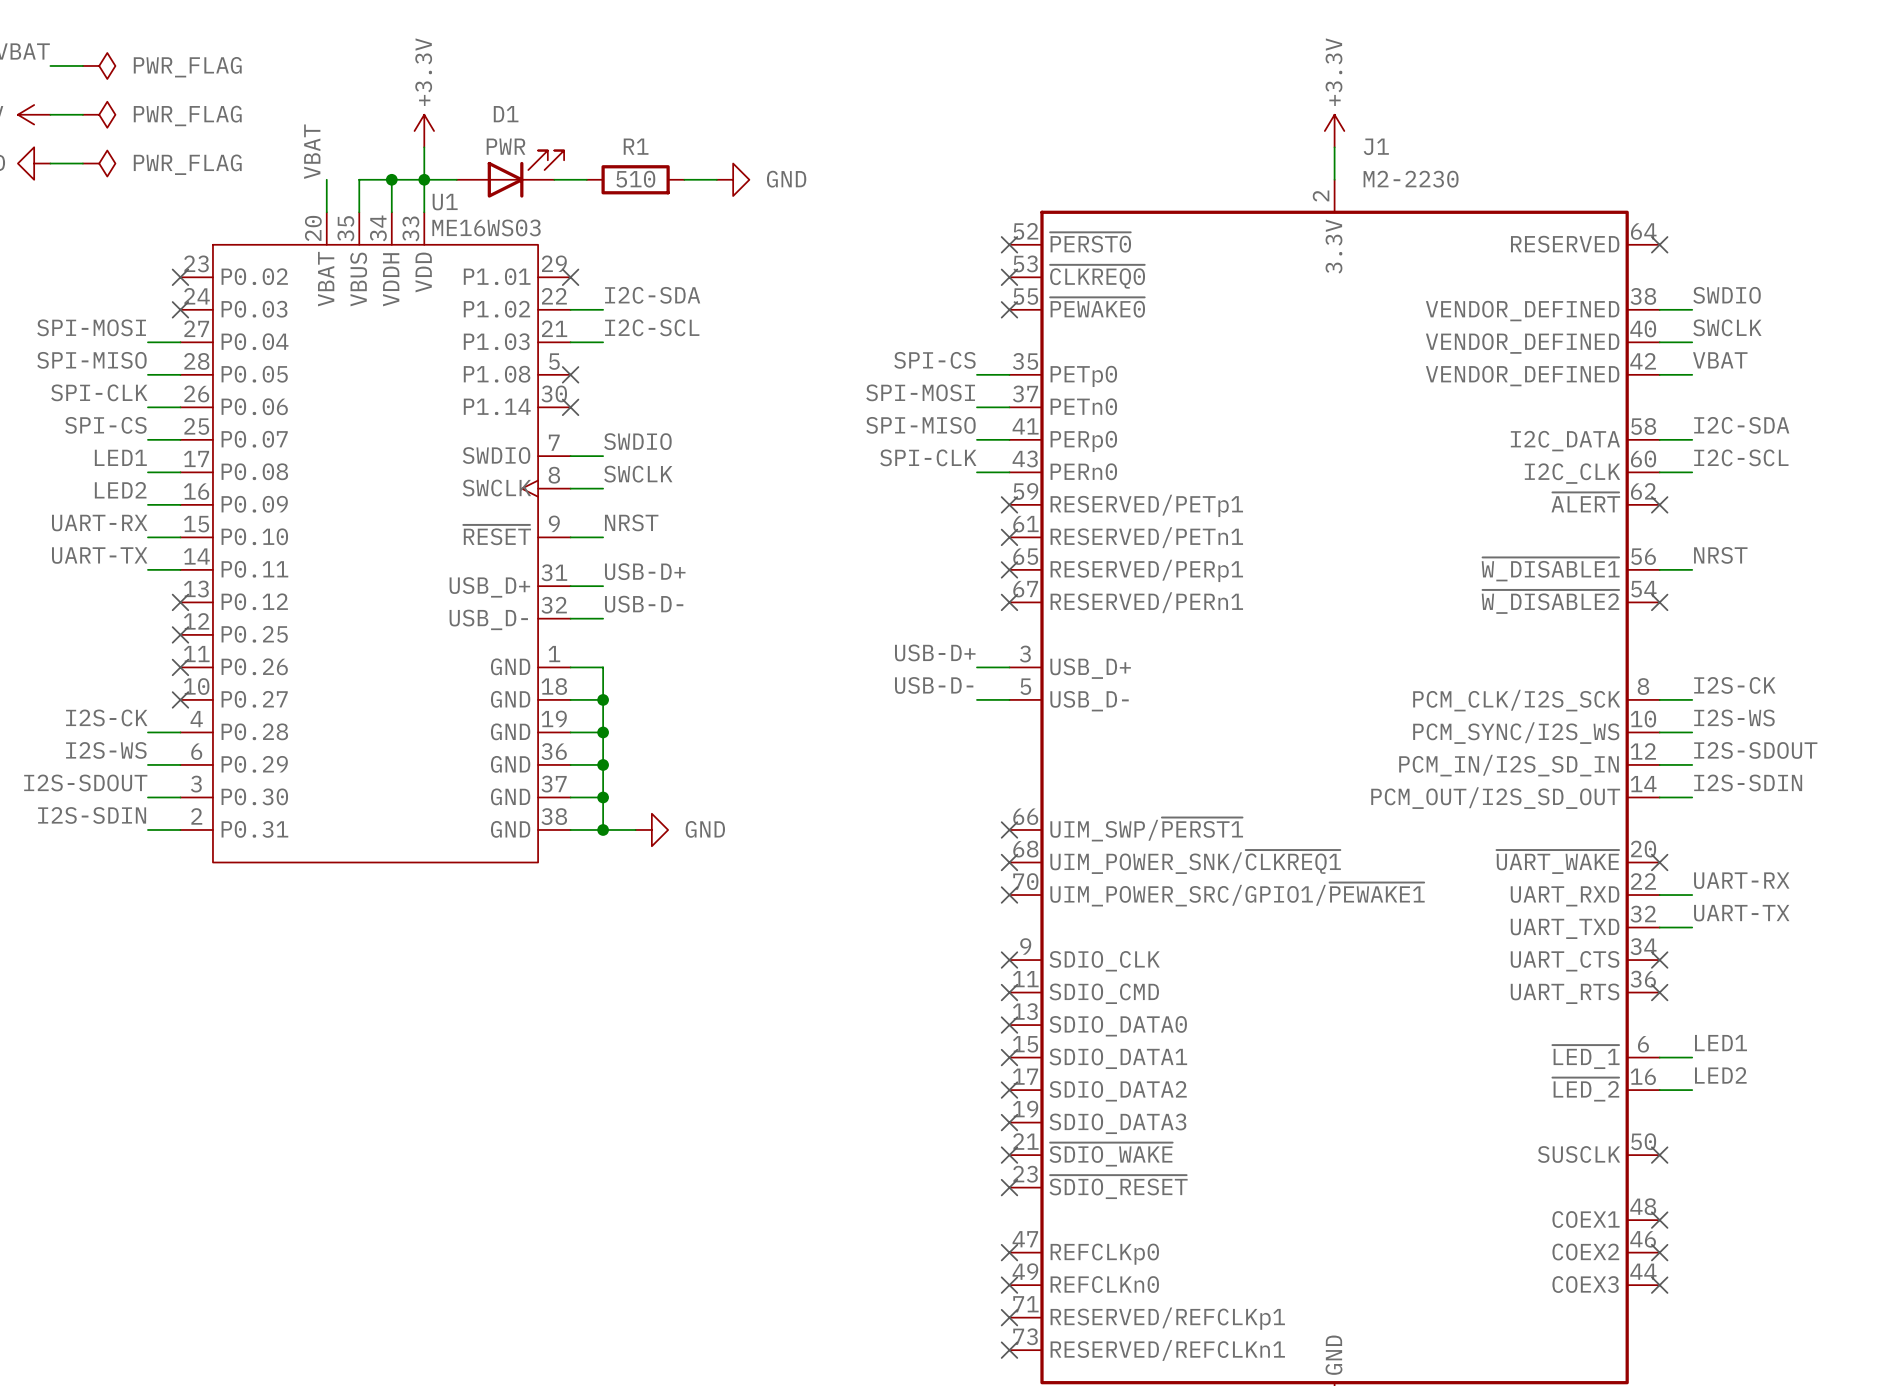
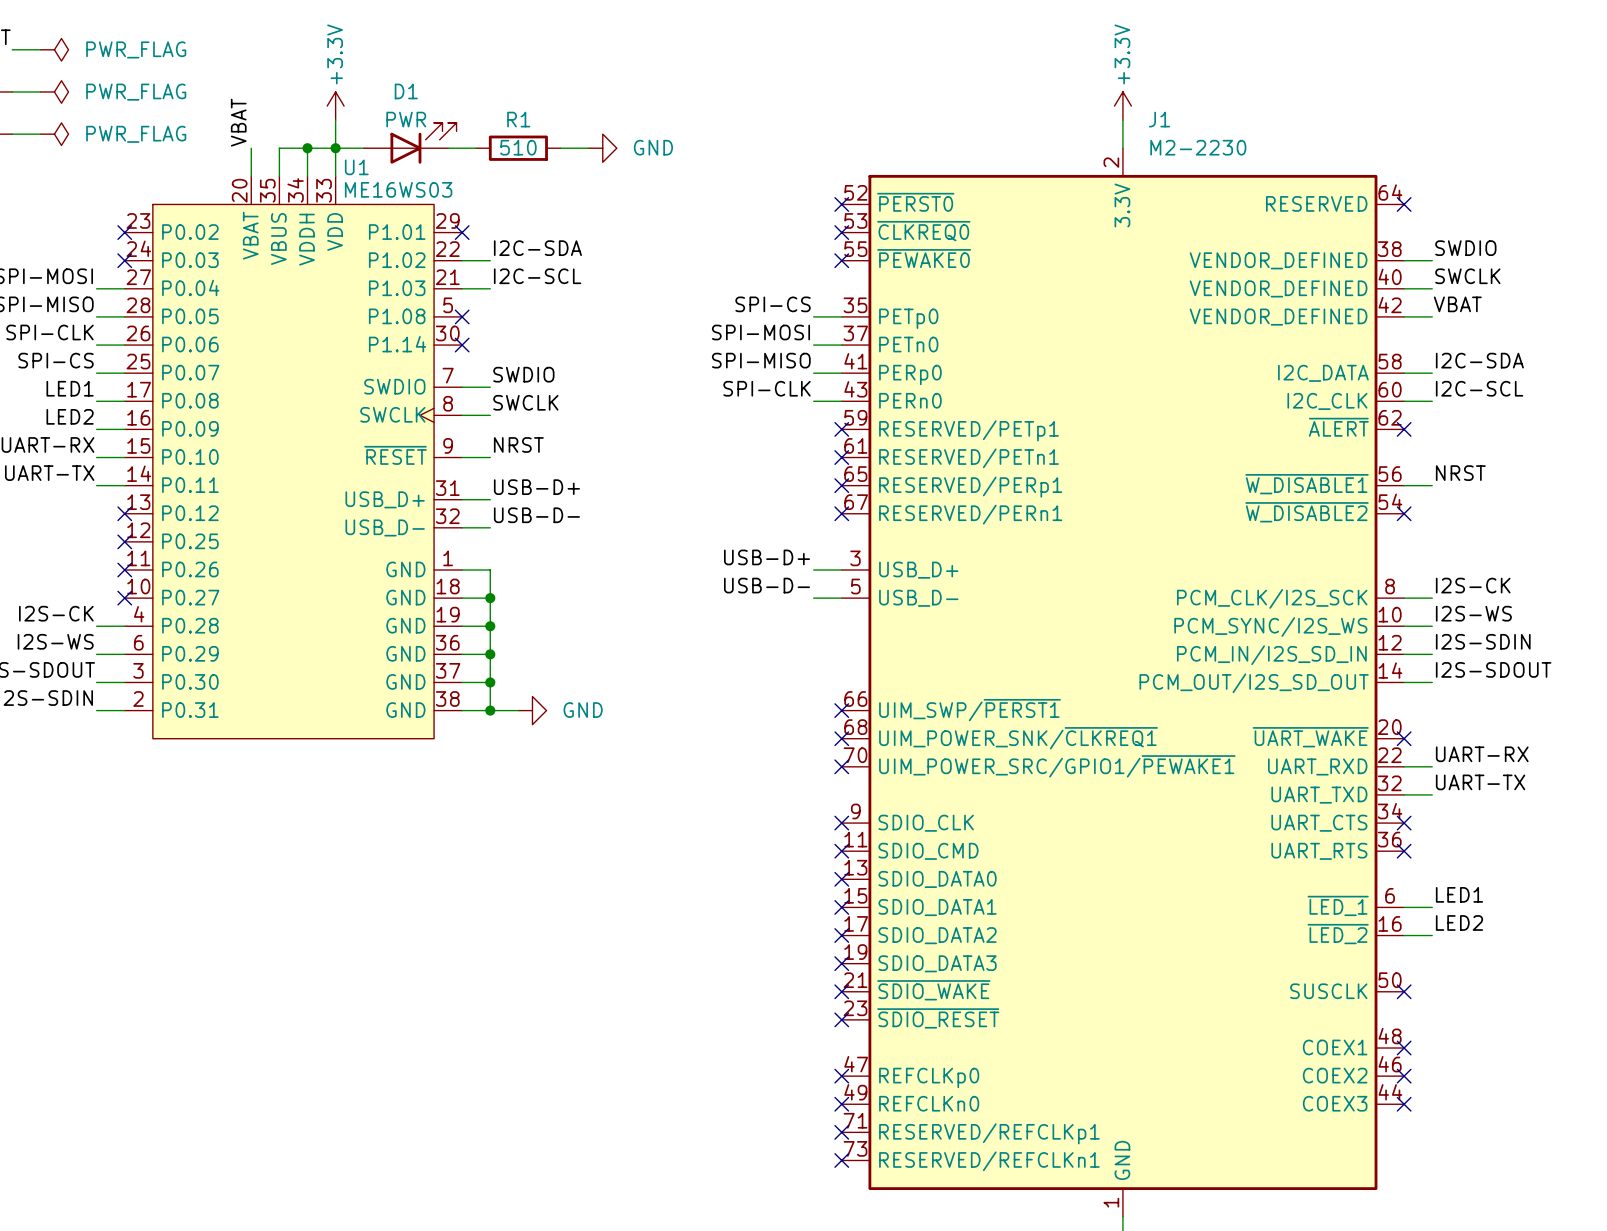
label: I2S-SDOUT (1755, 750) -> I2S-SDIN (1483, 641)
label: I2S-SDIN (1748, 782) -> I2S-SDOUT (1493, 669)

